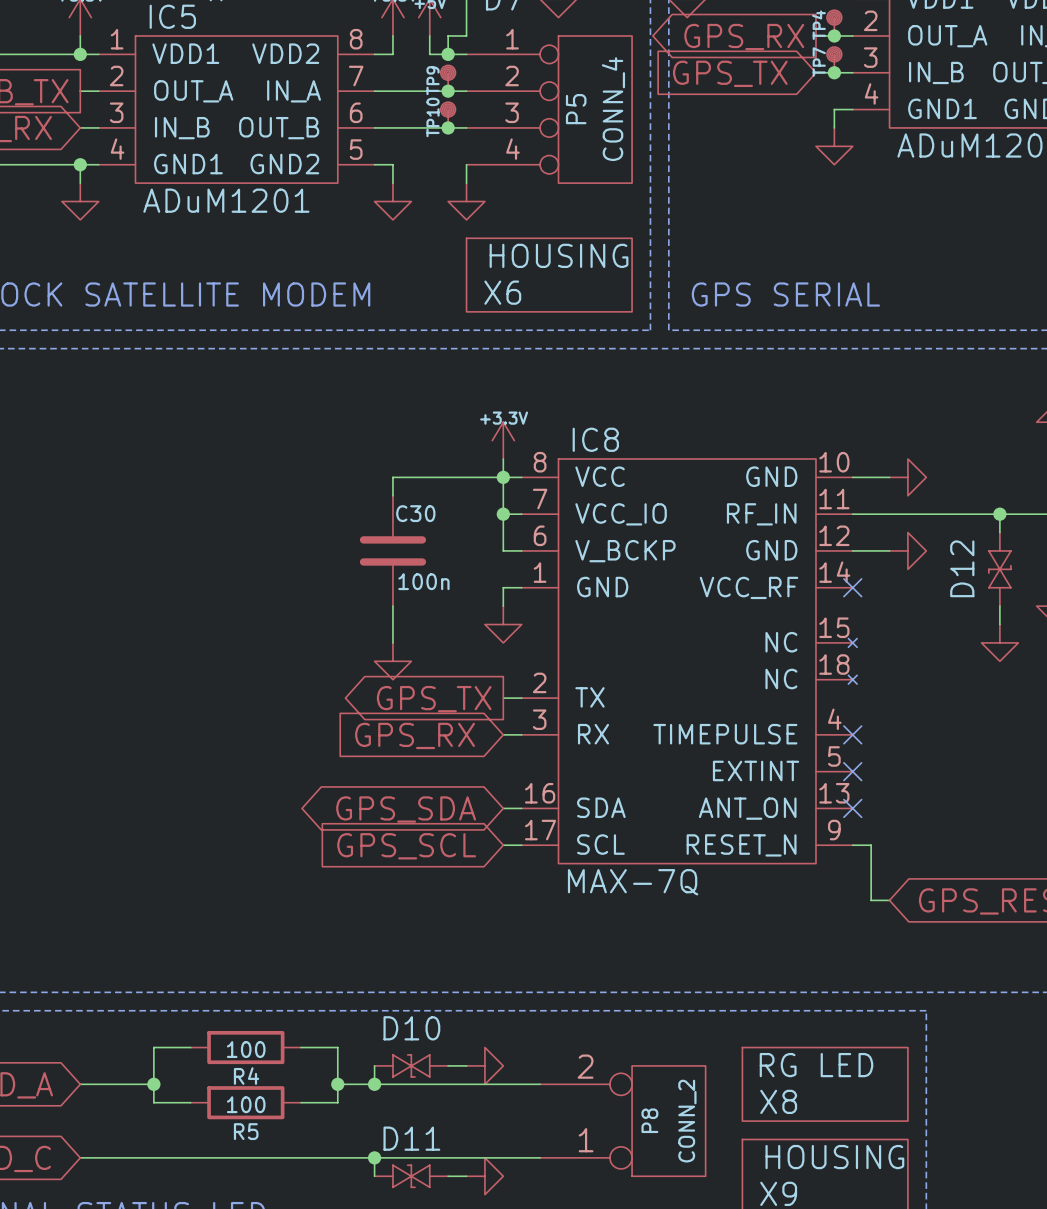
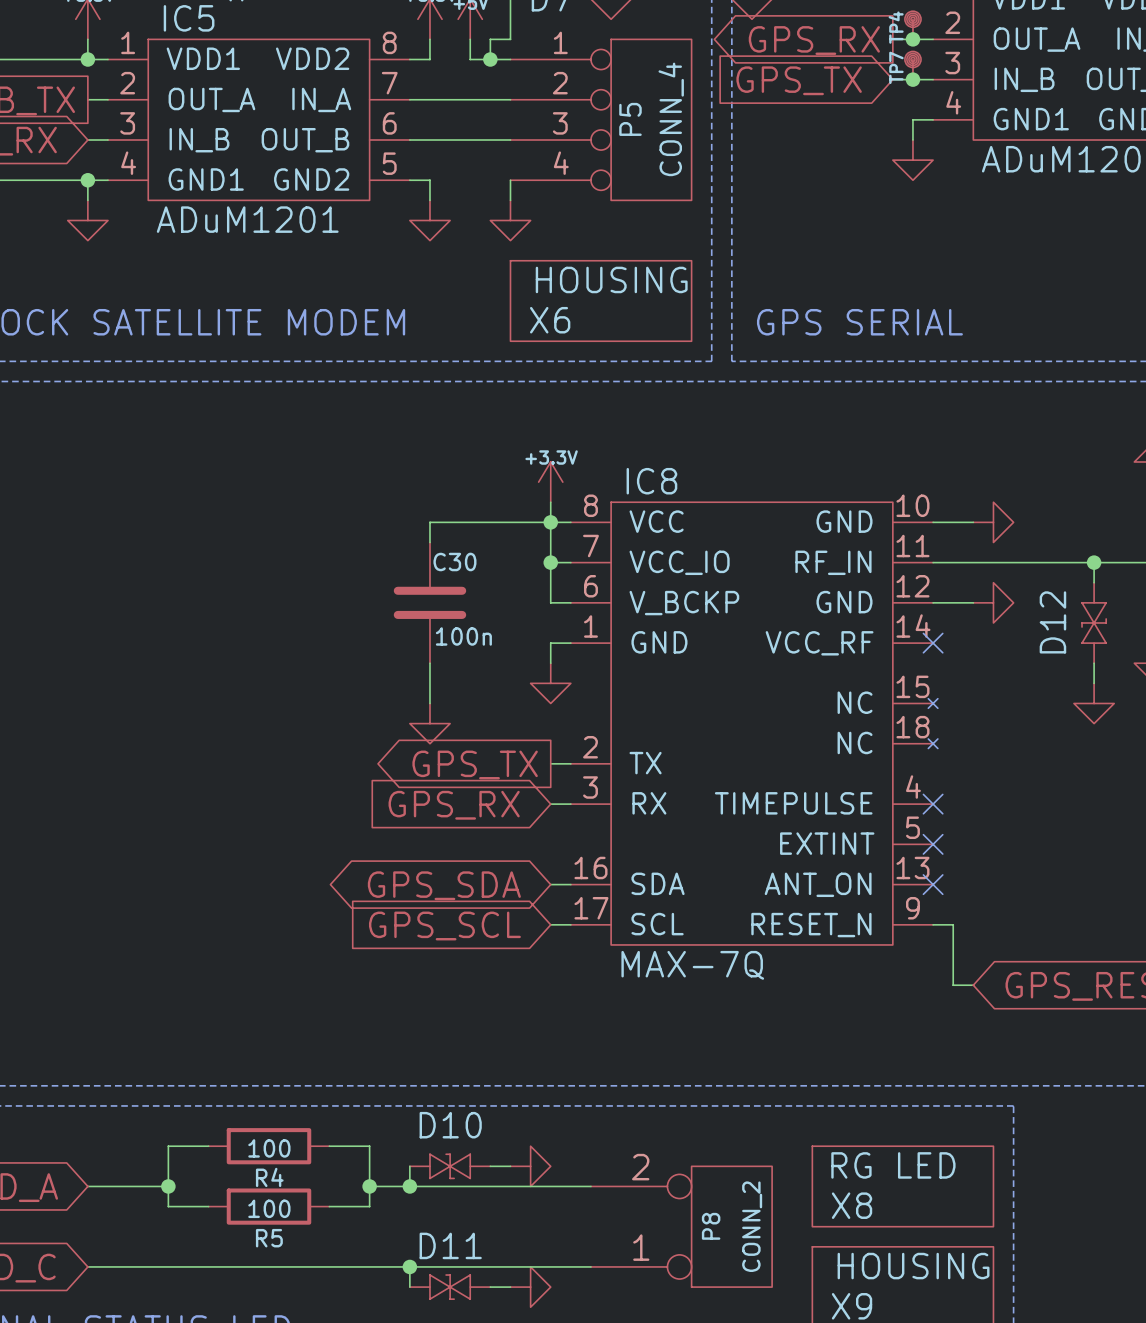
TP9: (448, 78) -> none
junction: (448, 91) -> none
TP10: (448, 115) -> none
junction: (448, 127) -> none

